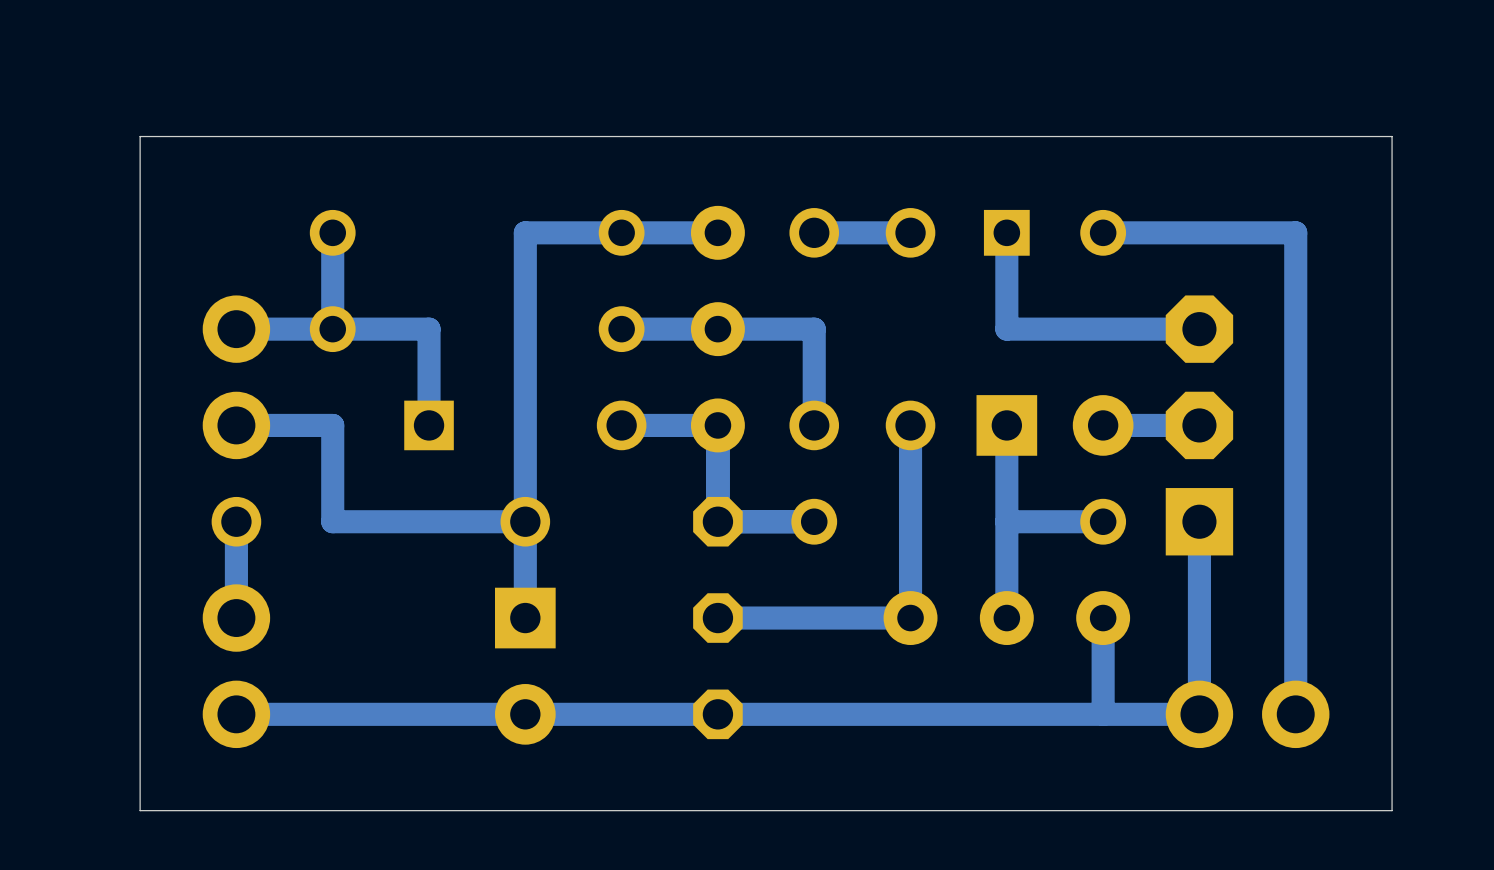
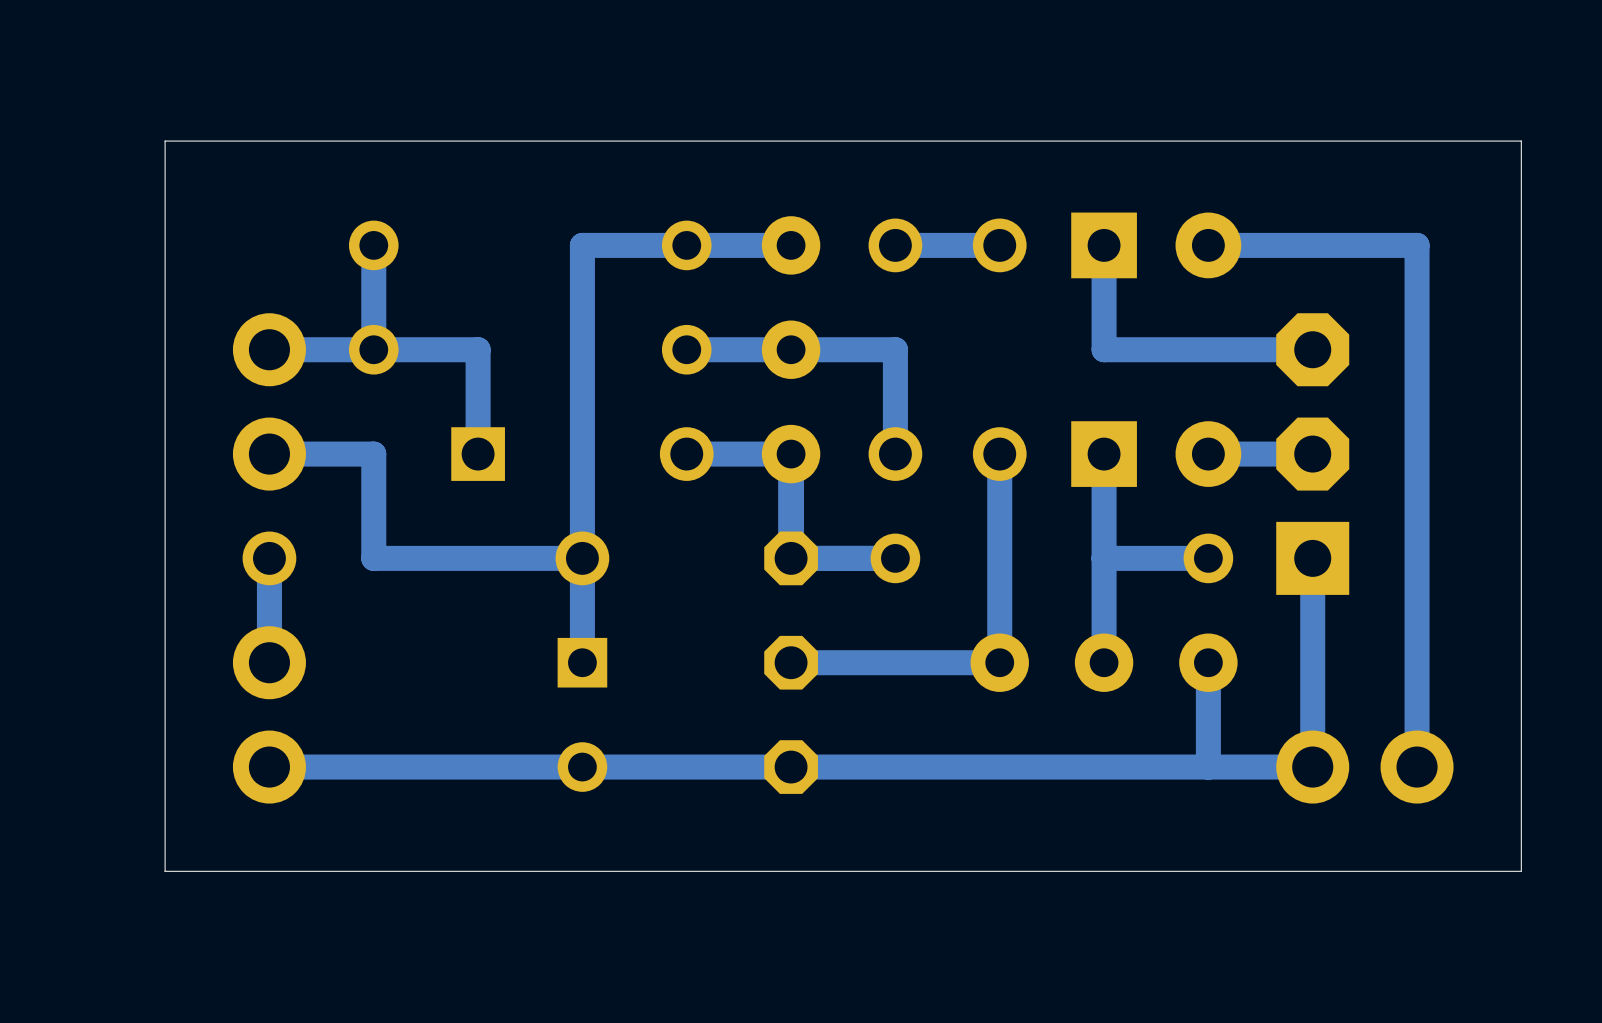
part footprint: [983, 209, 1127, 256] -> [1071, 212, 1242, 279]
part footprint: [494, 587, 556, 745] -> [557, 637, 608, 792]

